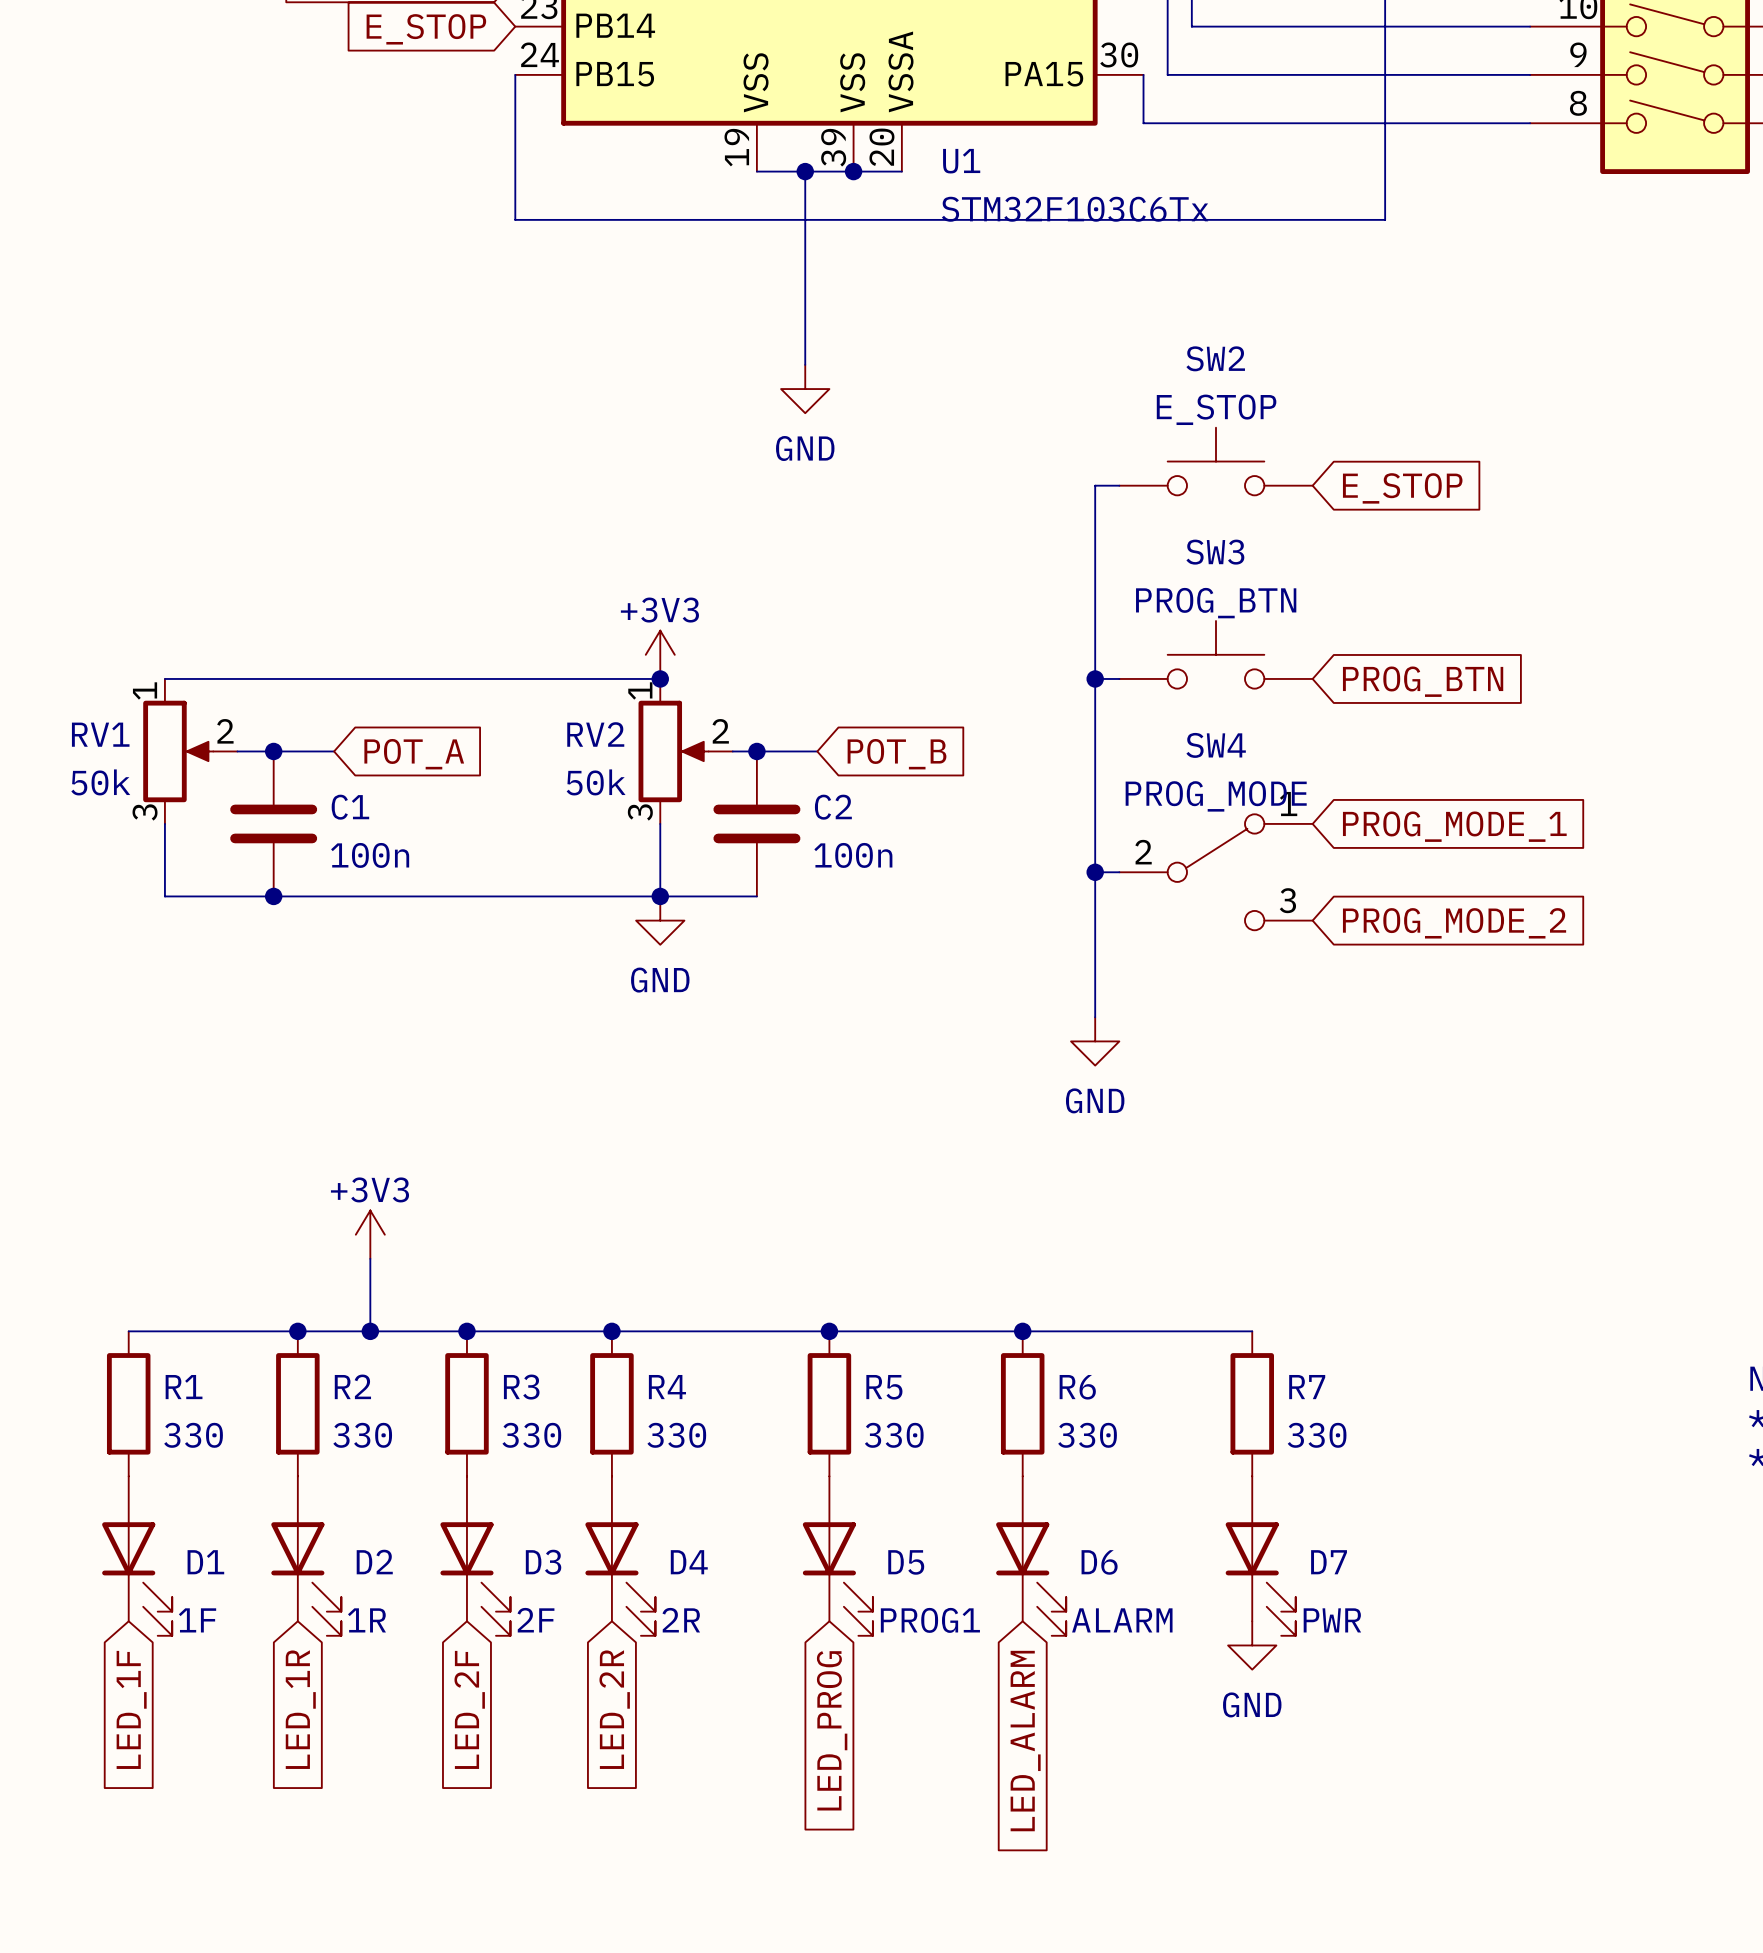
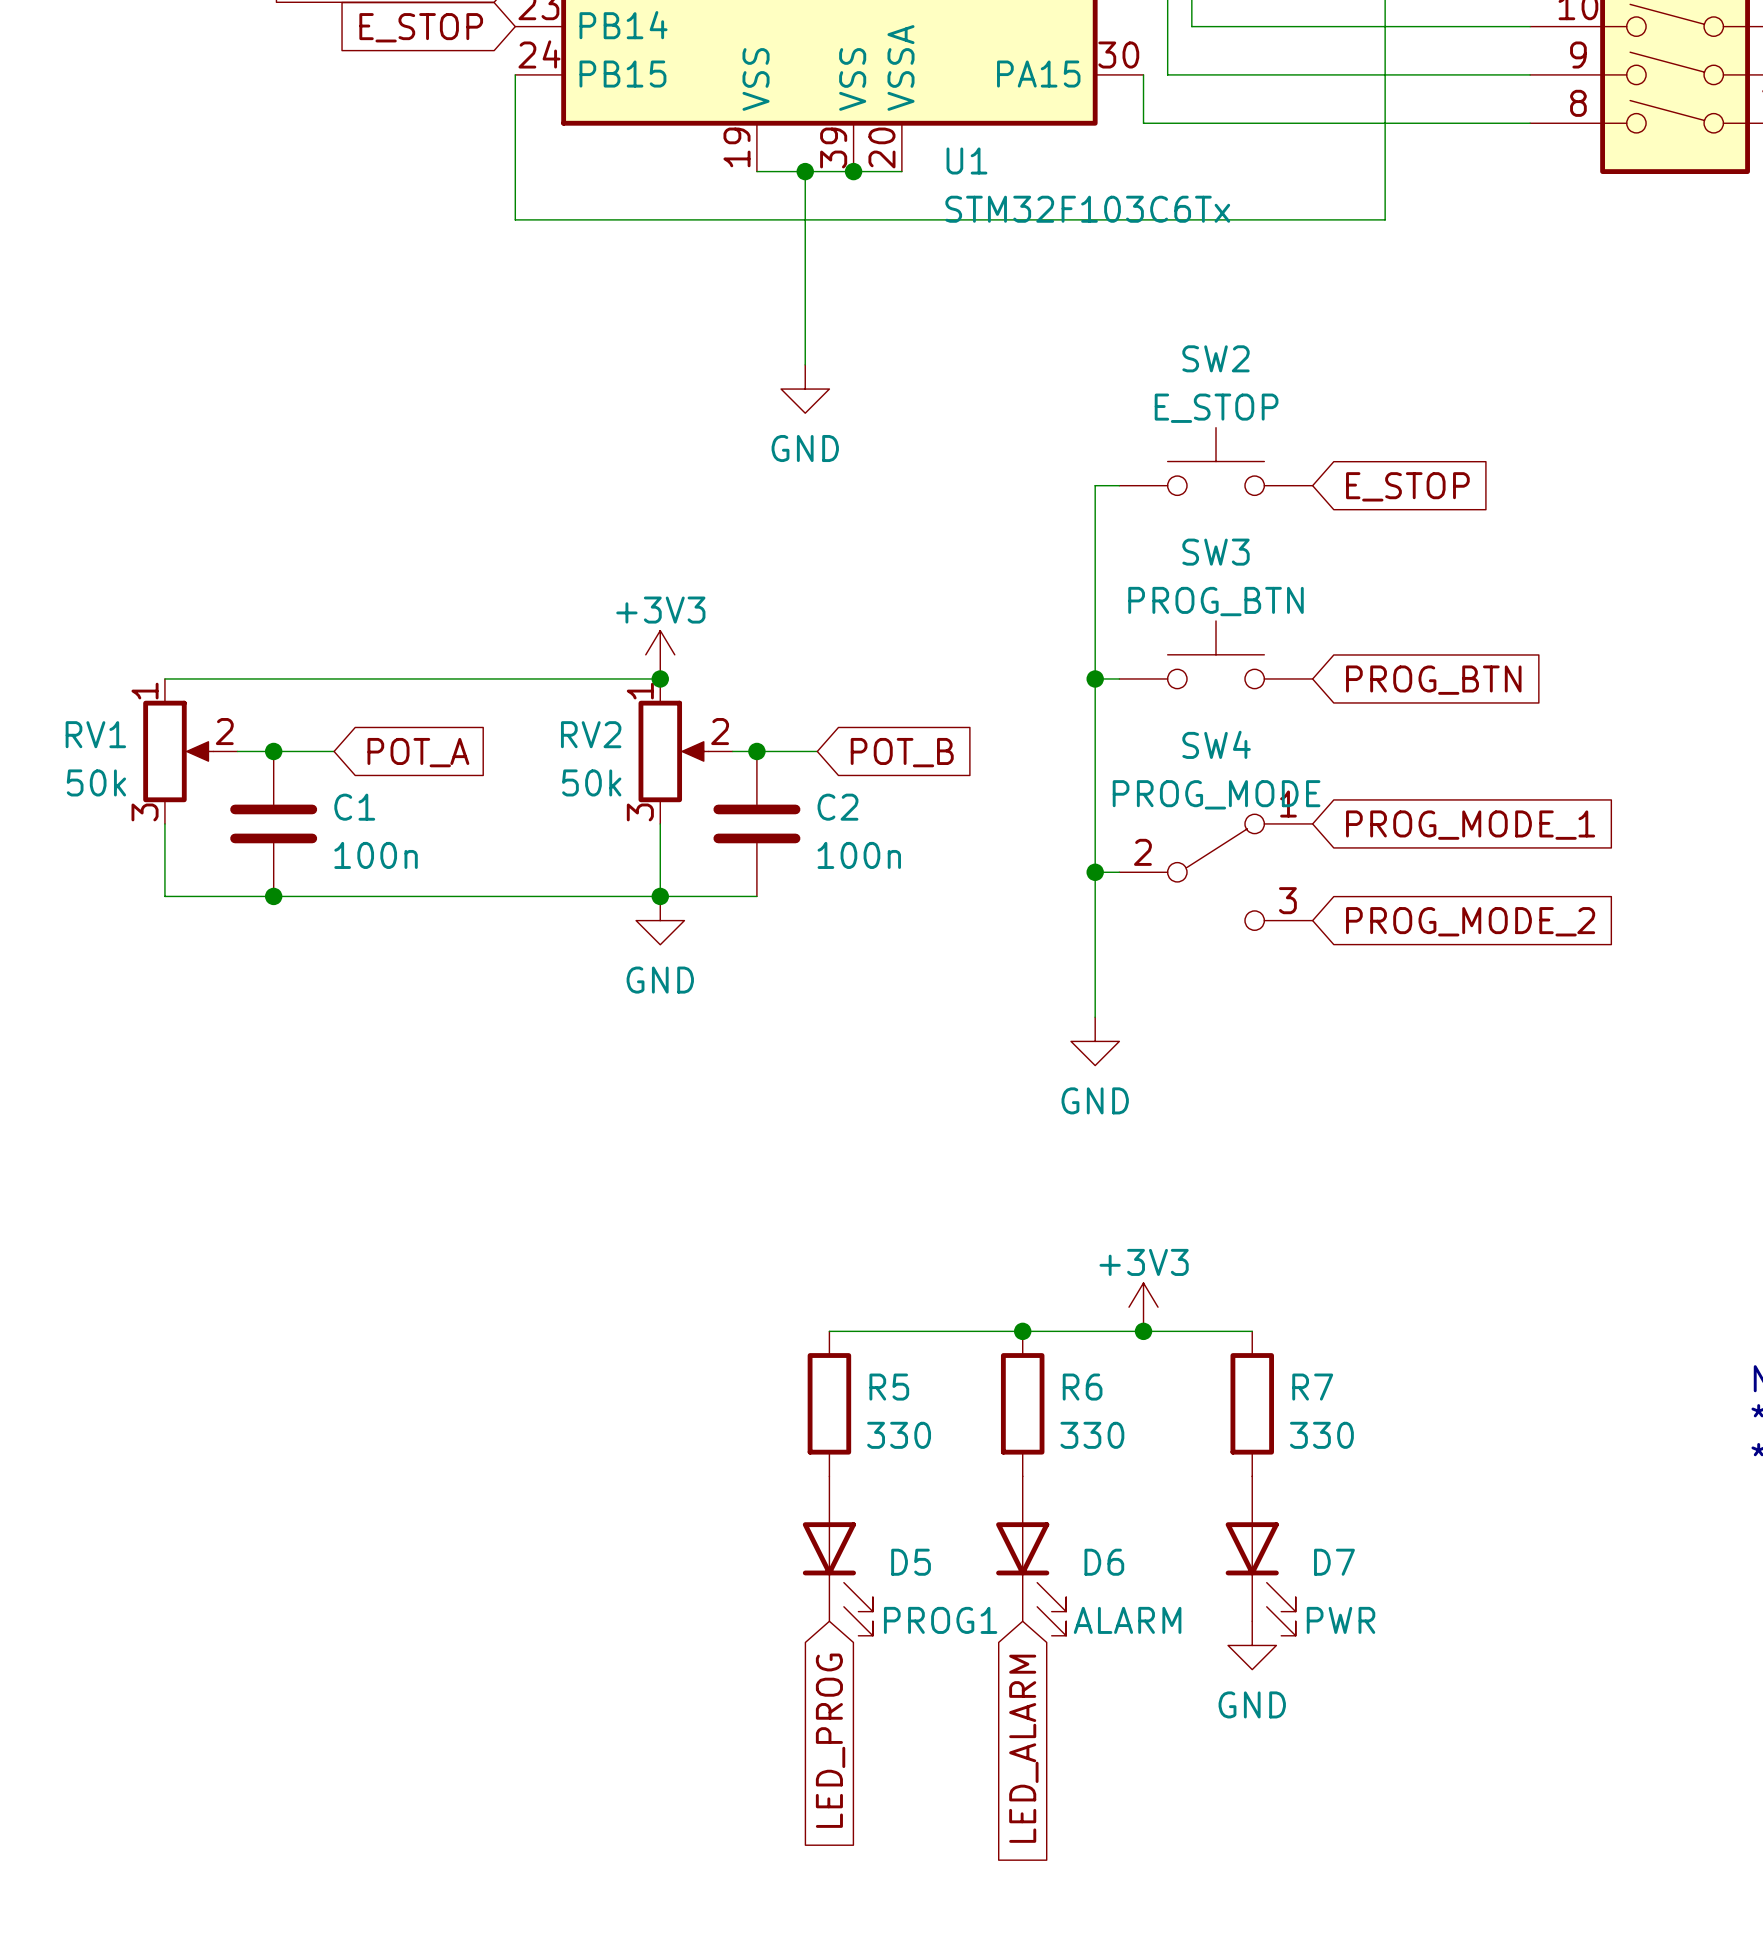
power symbol: +3V3 (370, 1234) -> none
wire: (370, 1258) (370, 1331) -> none
power symbol: none -> +3V3 (1143, 1307)
wire: (128, 1331) (829, 1331) -> none
junction: (297, 1331) -> none
junction: (370, 1331) -> none
junction: (466, 1331) -> none
junction: (611, 1331) -> none
junction: (829, 1331) -> none
junction: none -> (1143, 1331)
R1: 330 (128, 1403) -> none
R2: 330 (297, 1403) -> none
R3: 330 (466, 1403) -> none
R4: 330 (611, 1403) -> none
D1: (137, 1556) -> none
D2: (306, 1556) -> none
D3: (475, 1556) -> none
D4: (620, 1556) -> none
global label: LED_1F (131, 1709) -> none
global label: LED_1R (300, 1709) -> none
global label: LED_2F (469, 1709) -> none
global label: LED_2R (614, 1709) -> none

